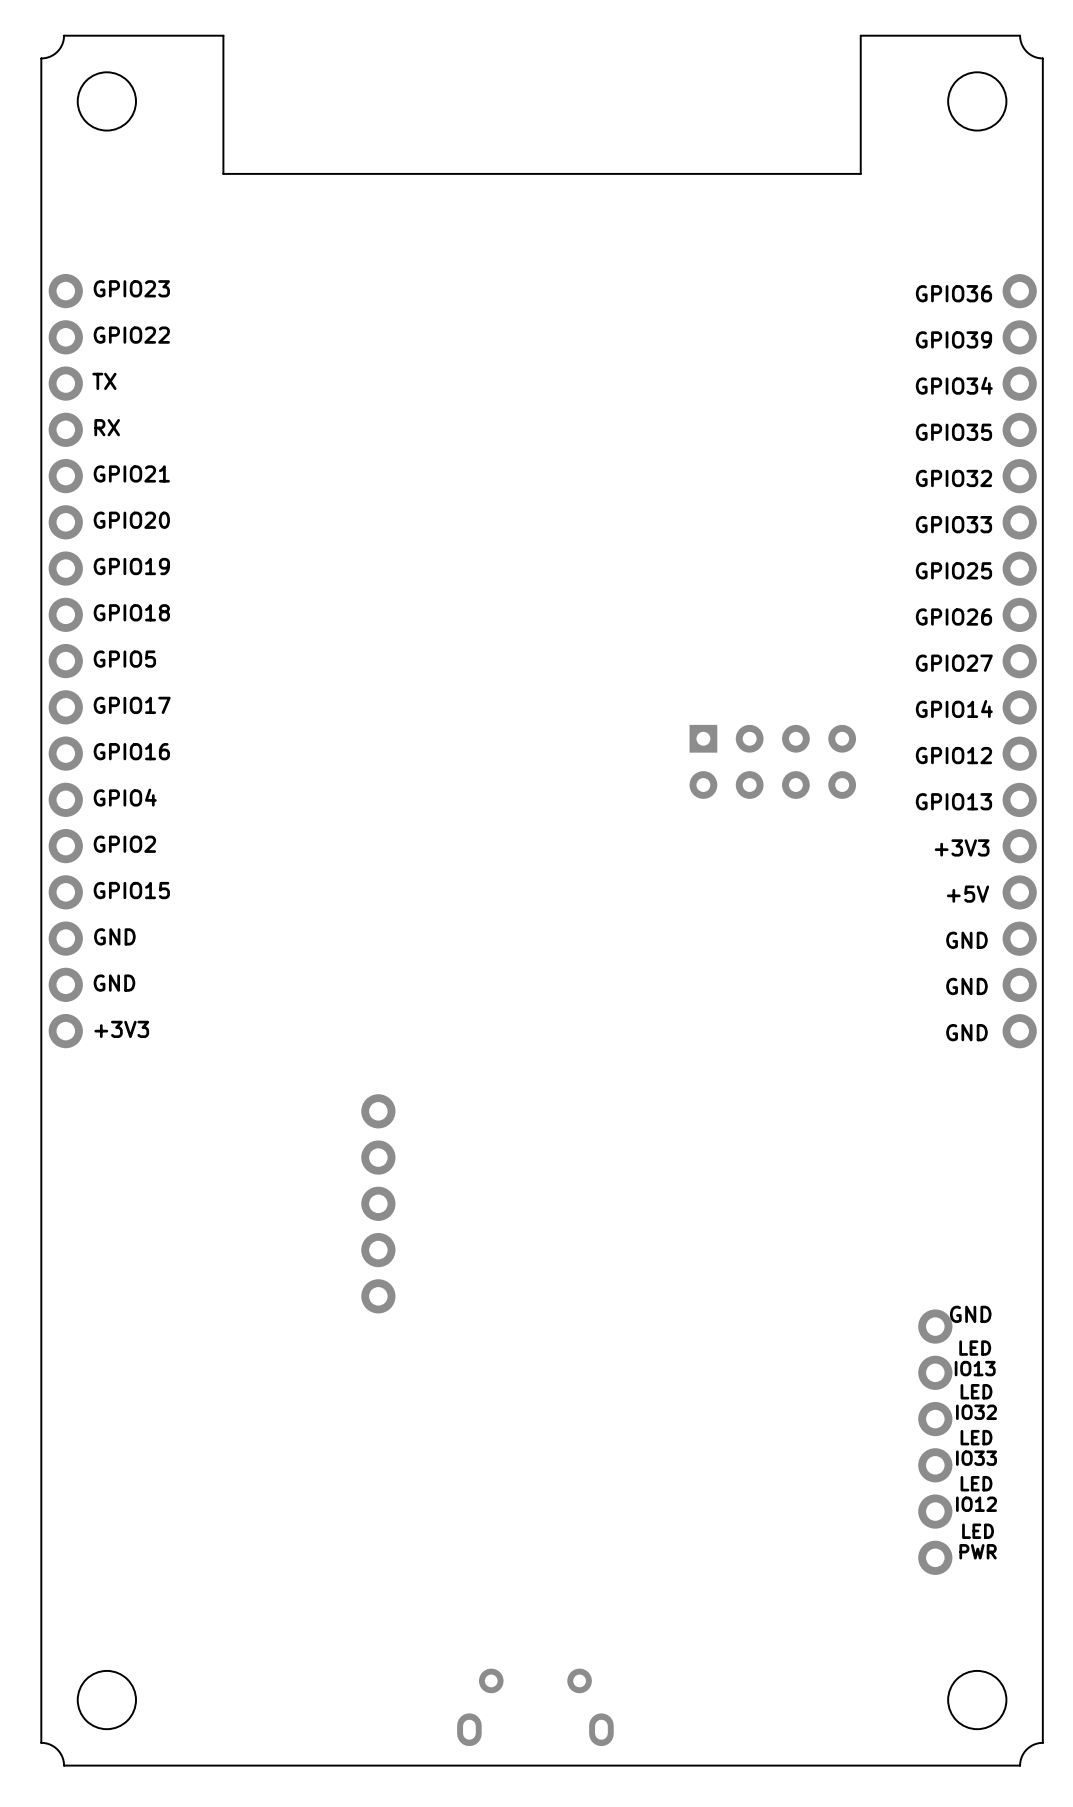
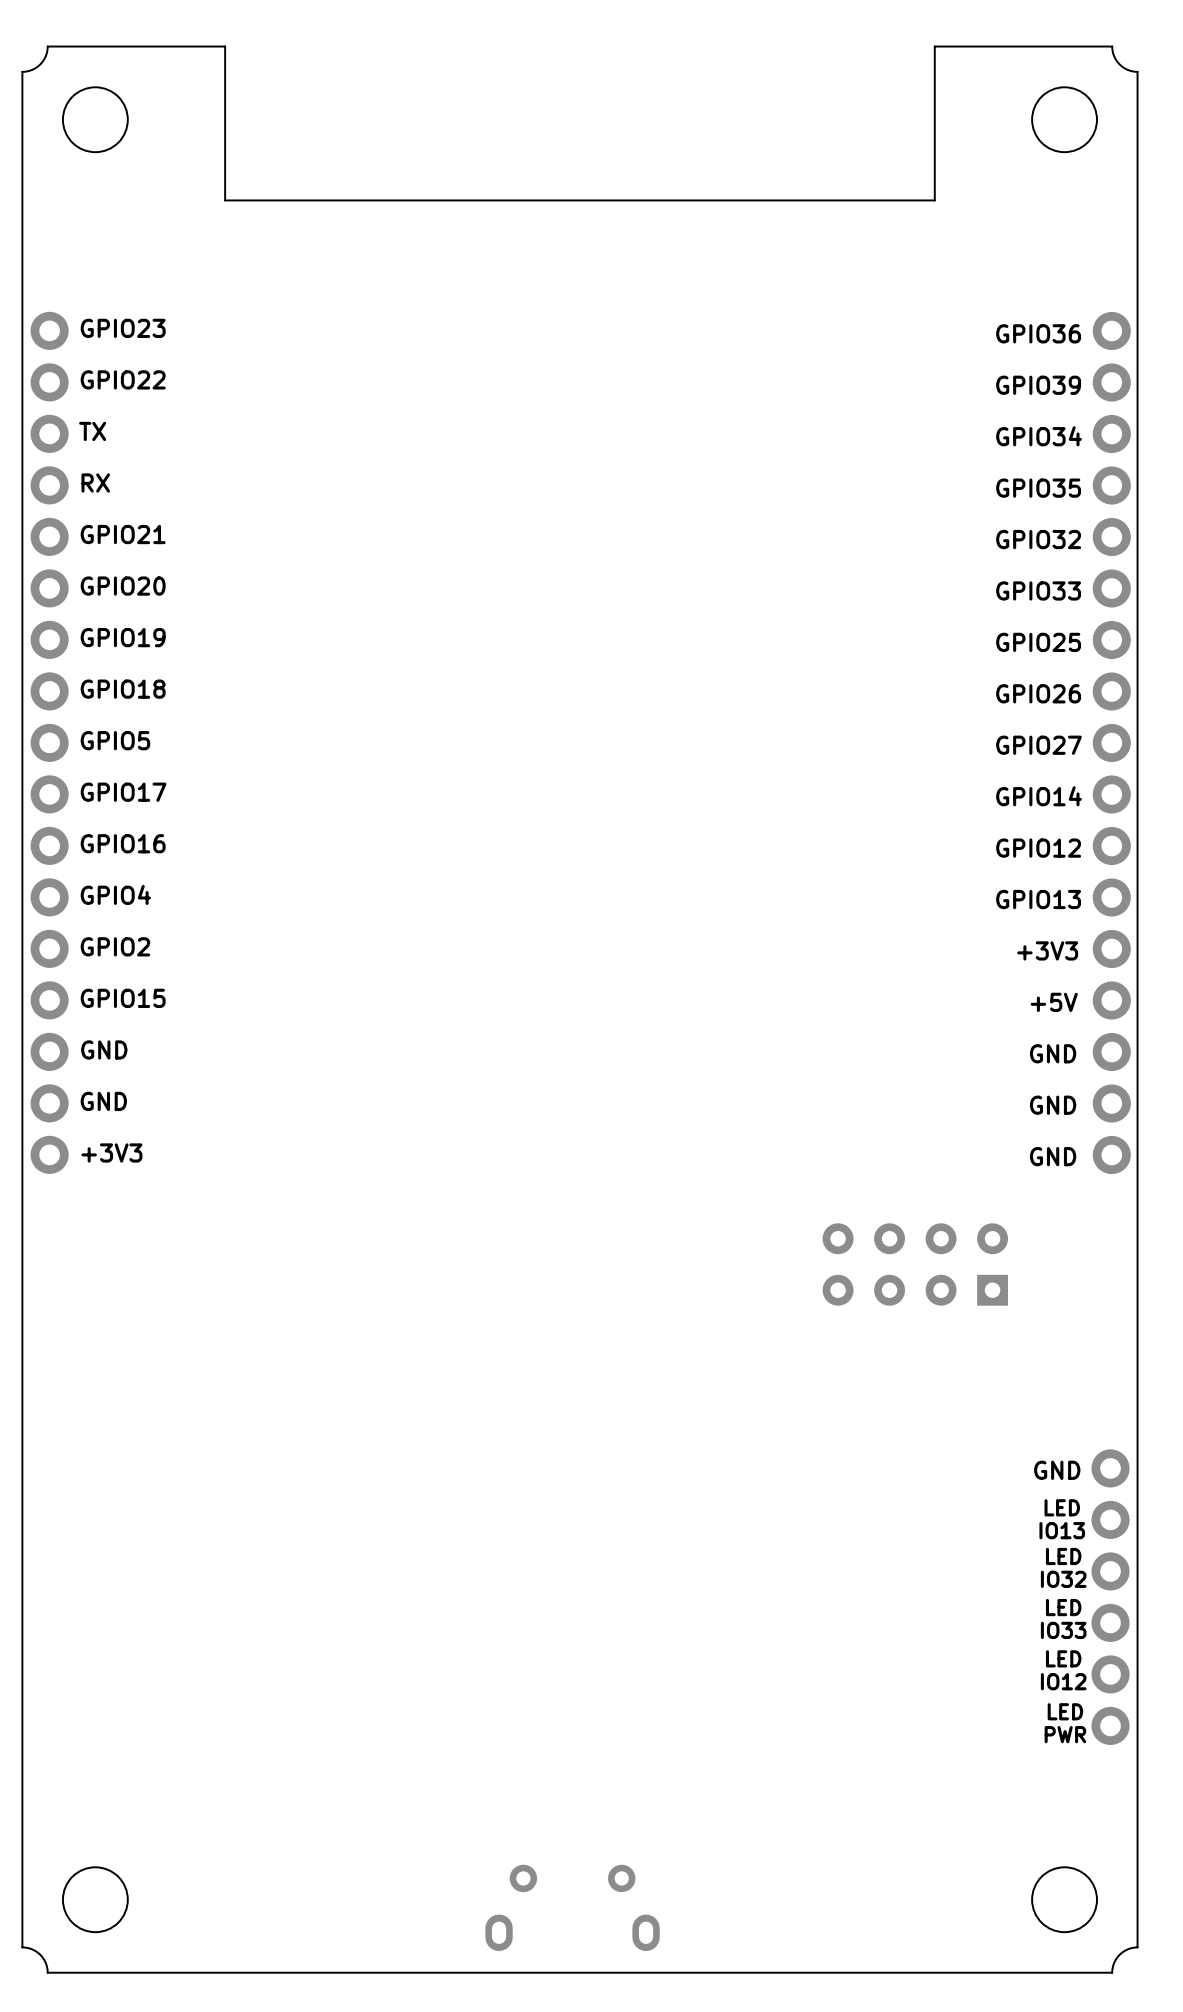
part rotation: 0° (772, 761) -> 180° (915, 1264)
part position: (772, 761) -> (915, 1264)
part: (378, 1203) -> none
part position: (935, 1442) -> (1110, 1597)

